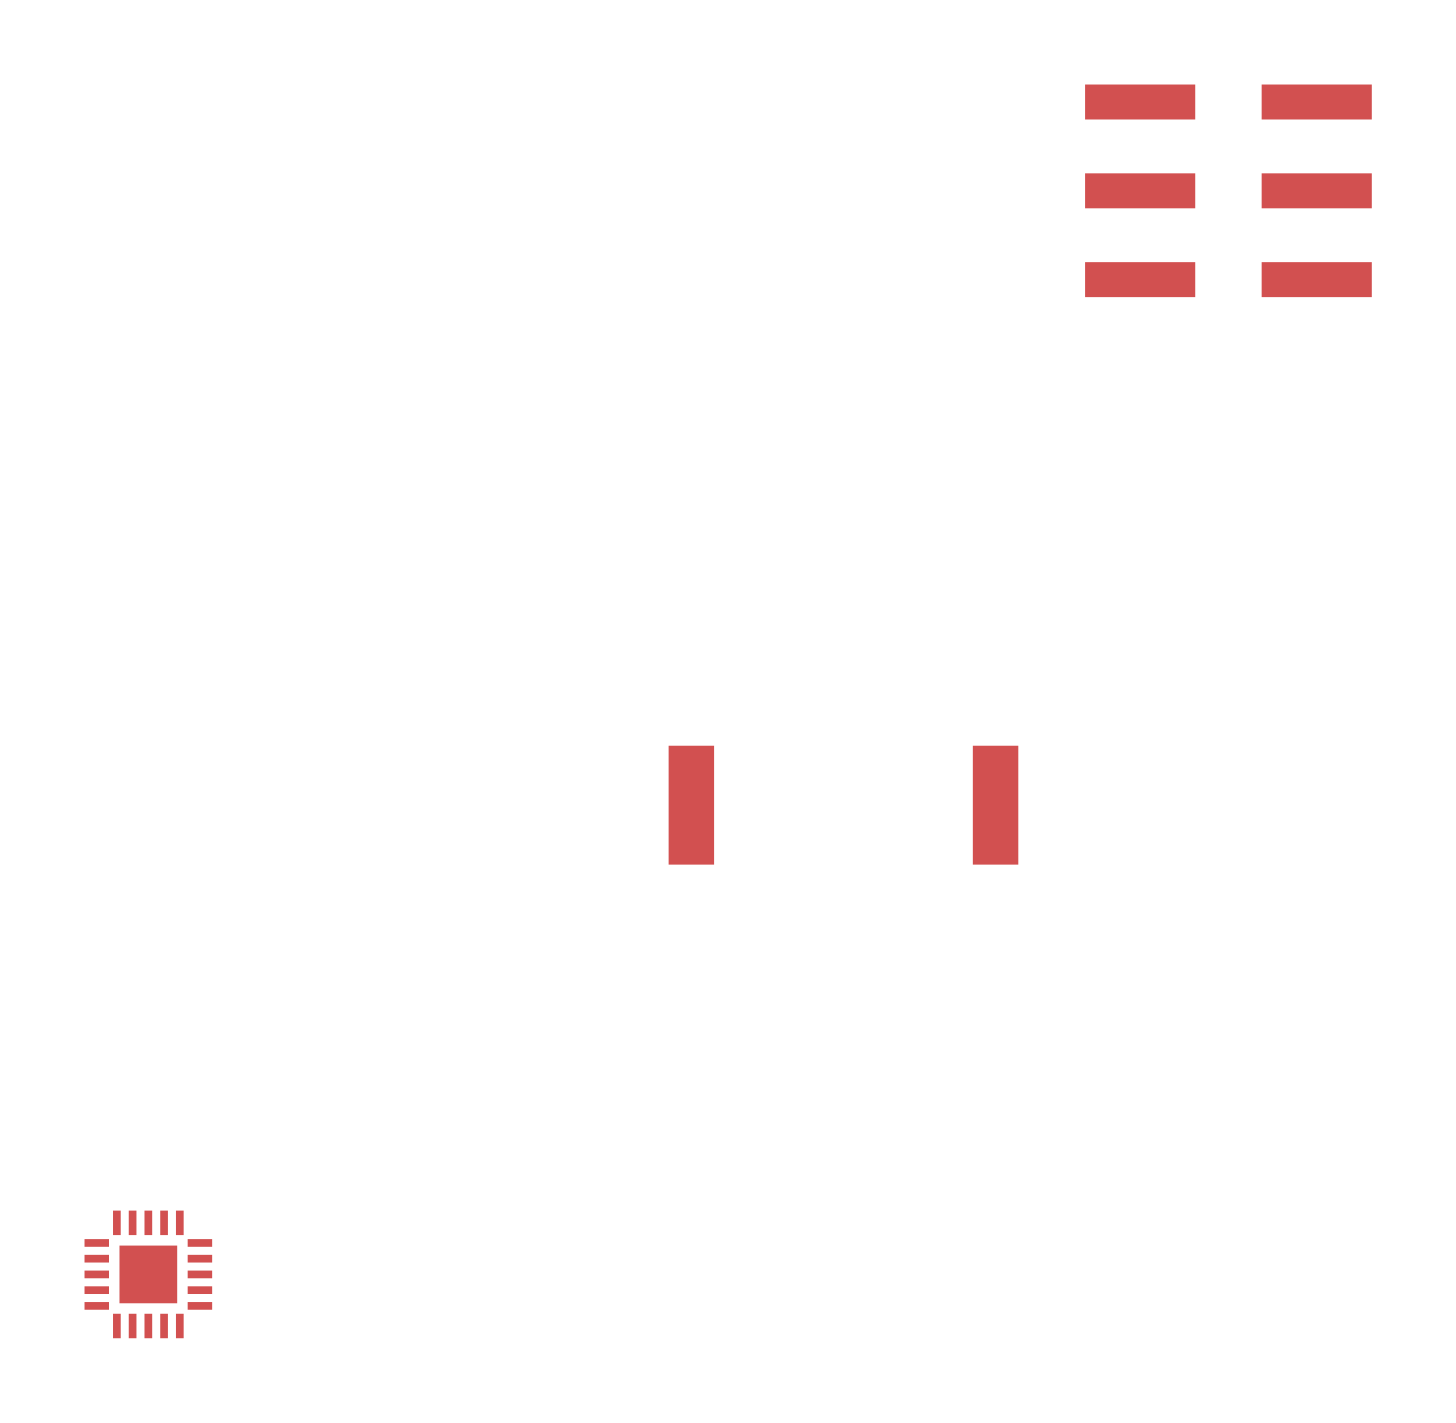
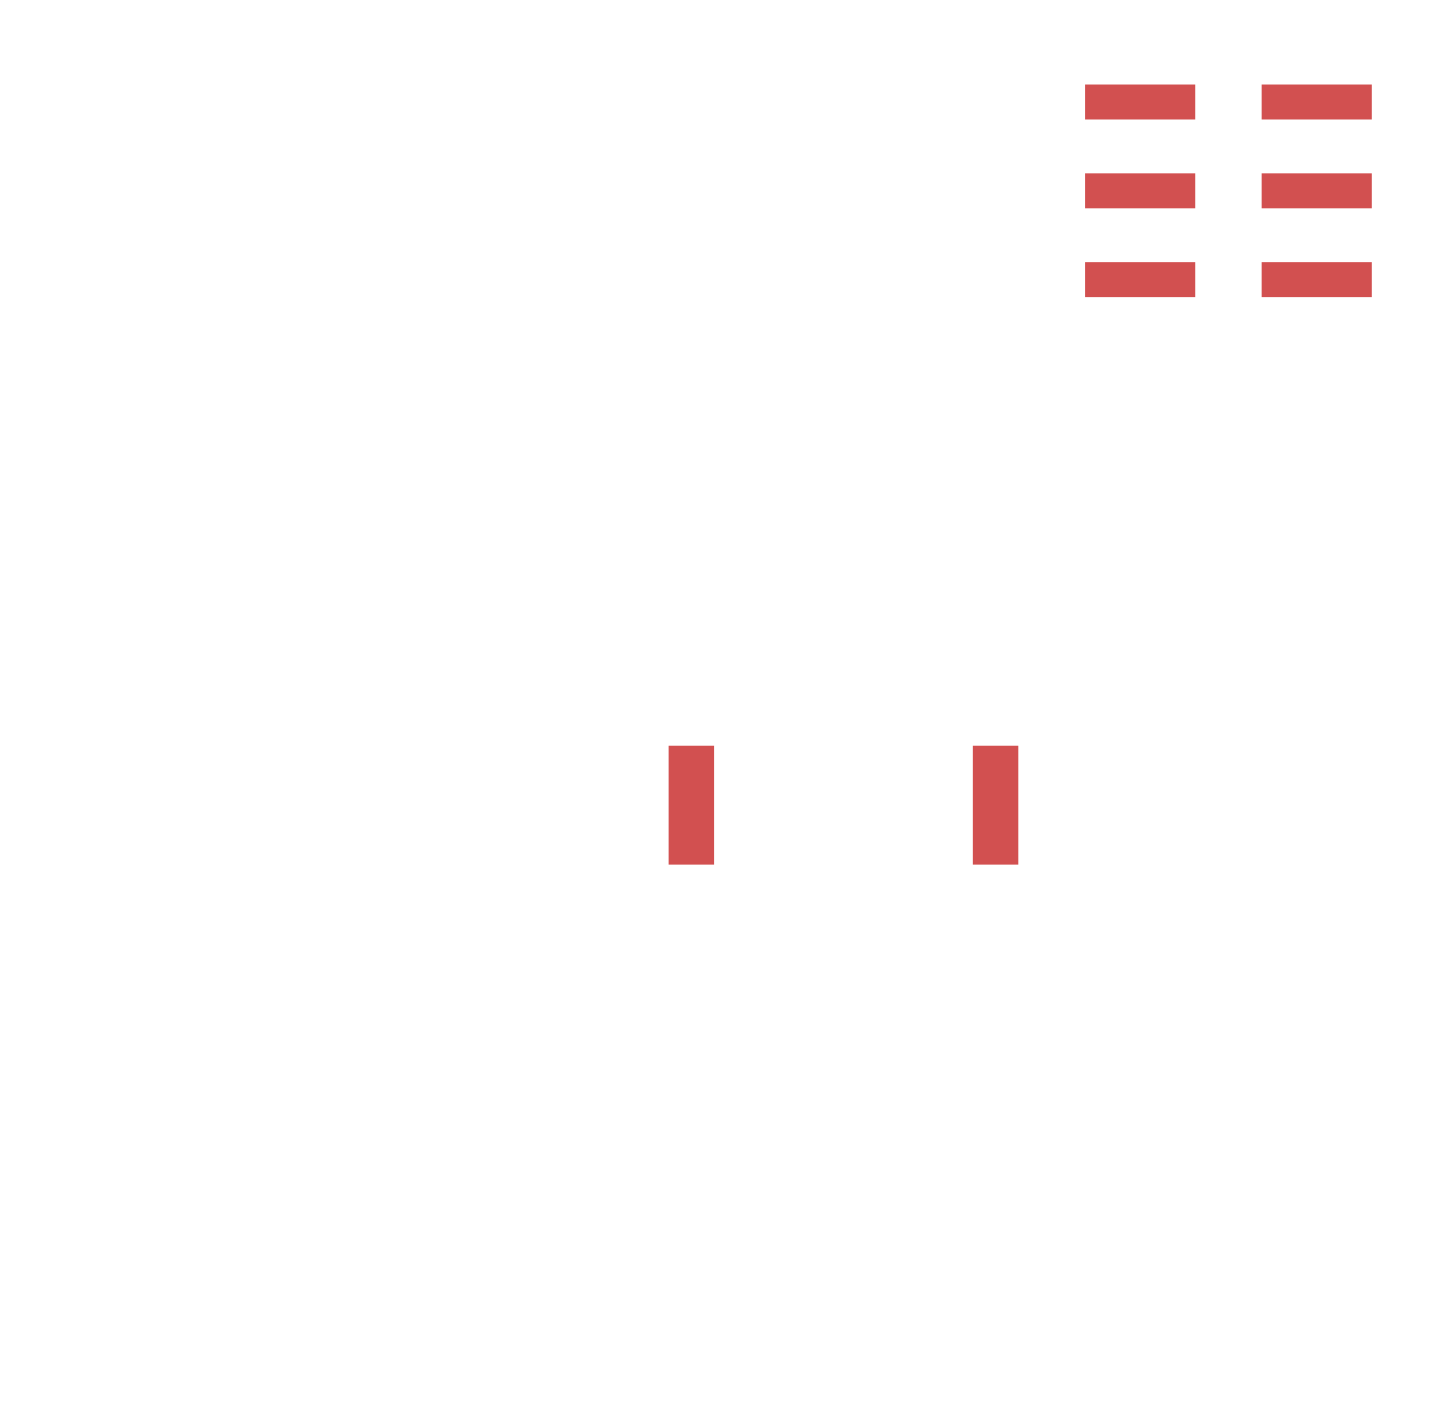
part: (148, 1274) -> none

